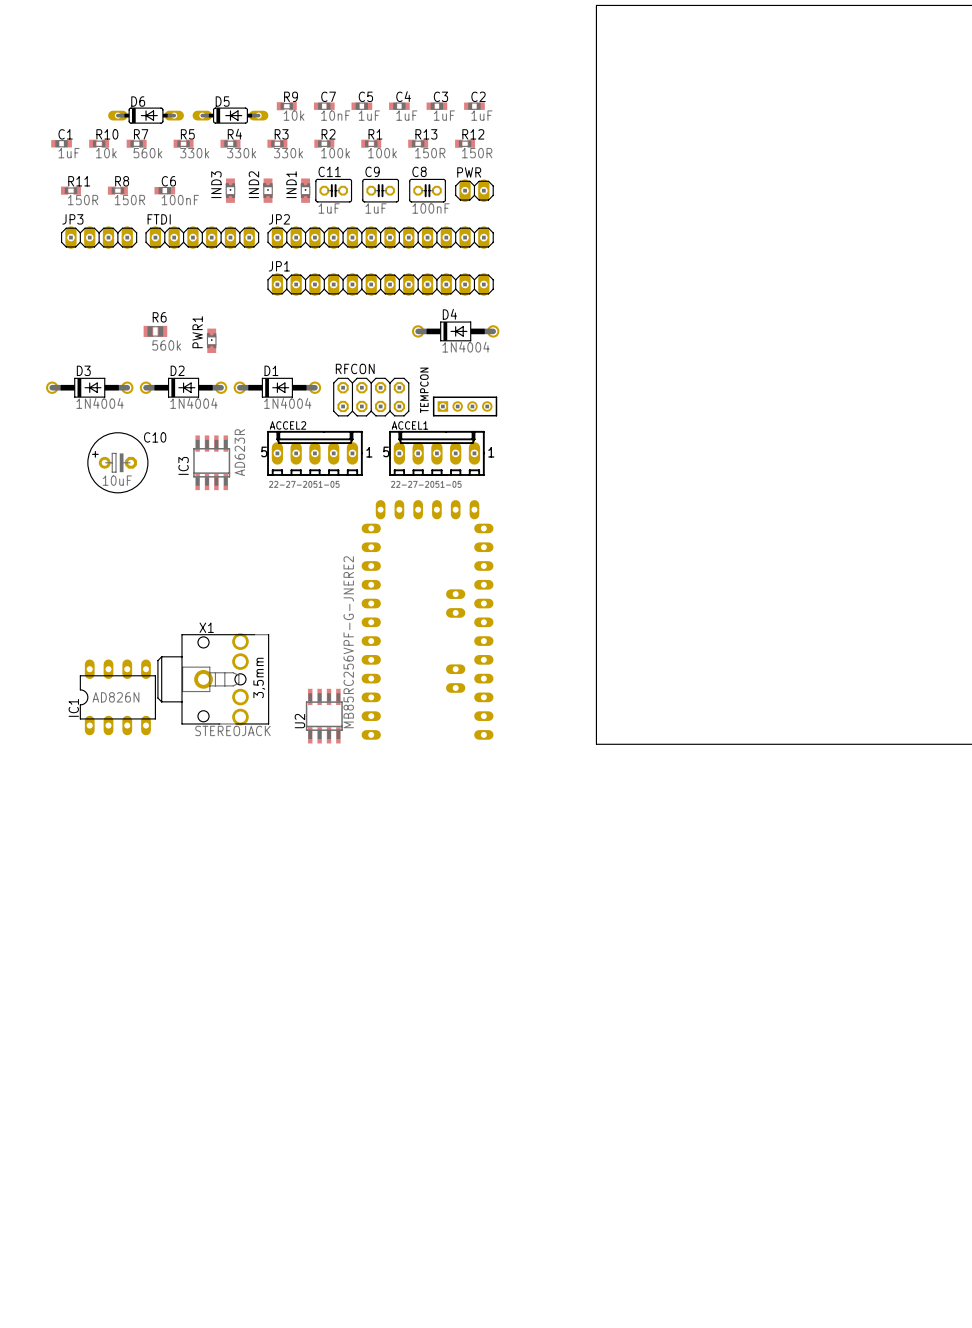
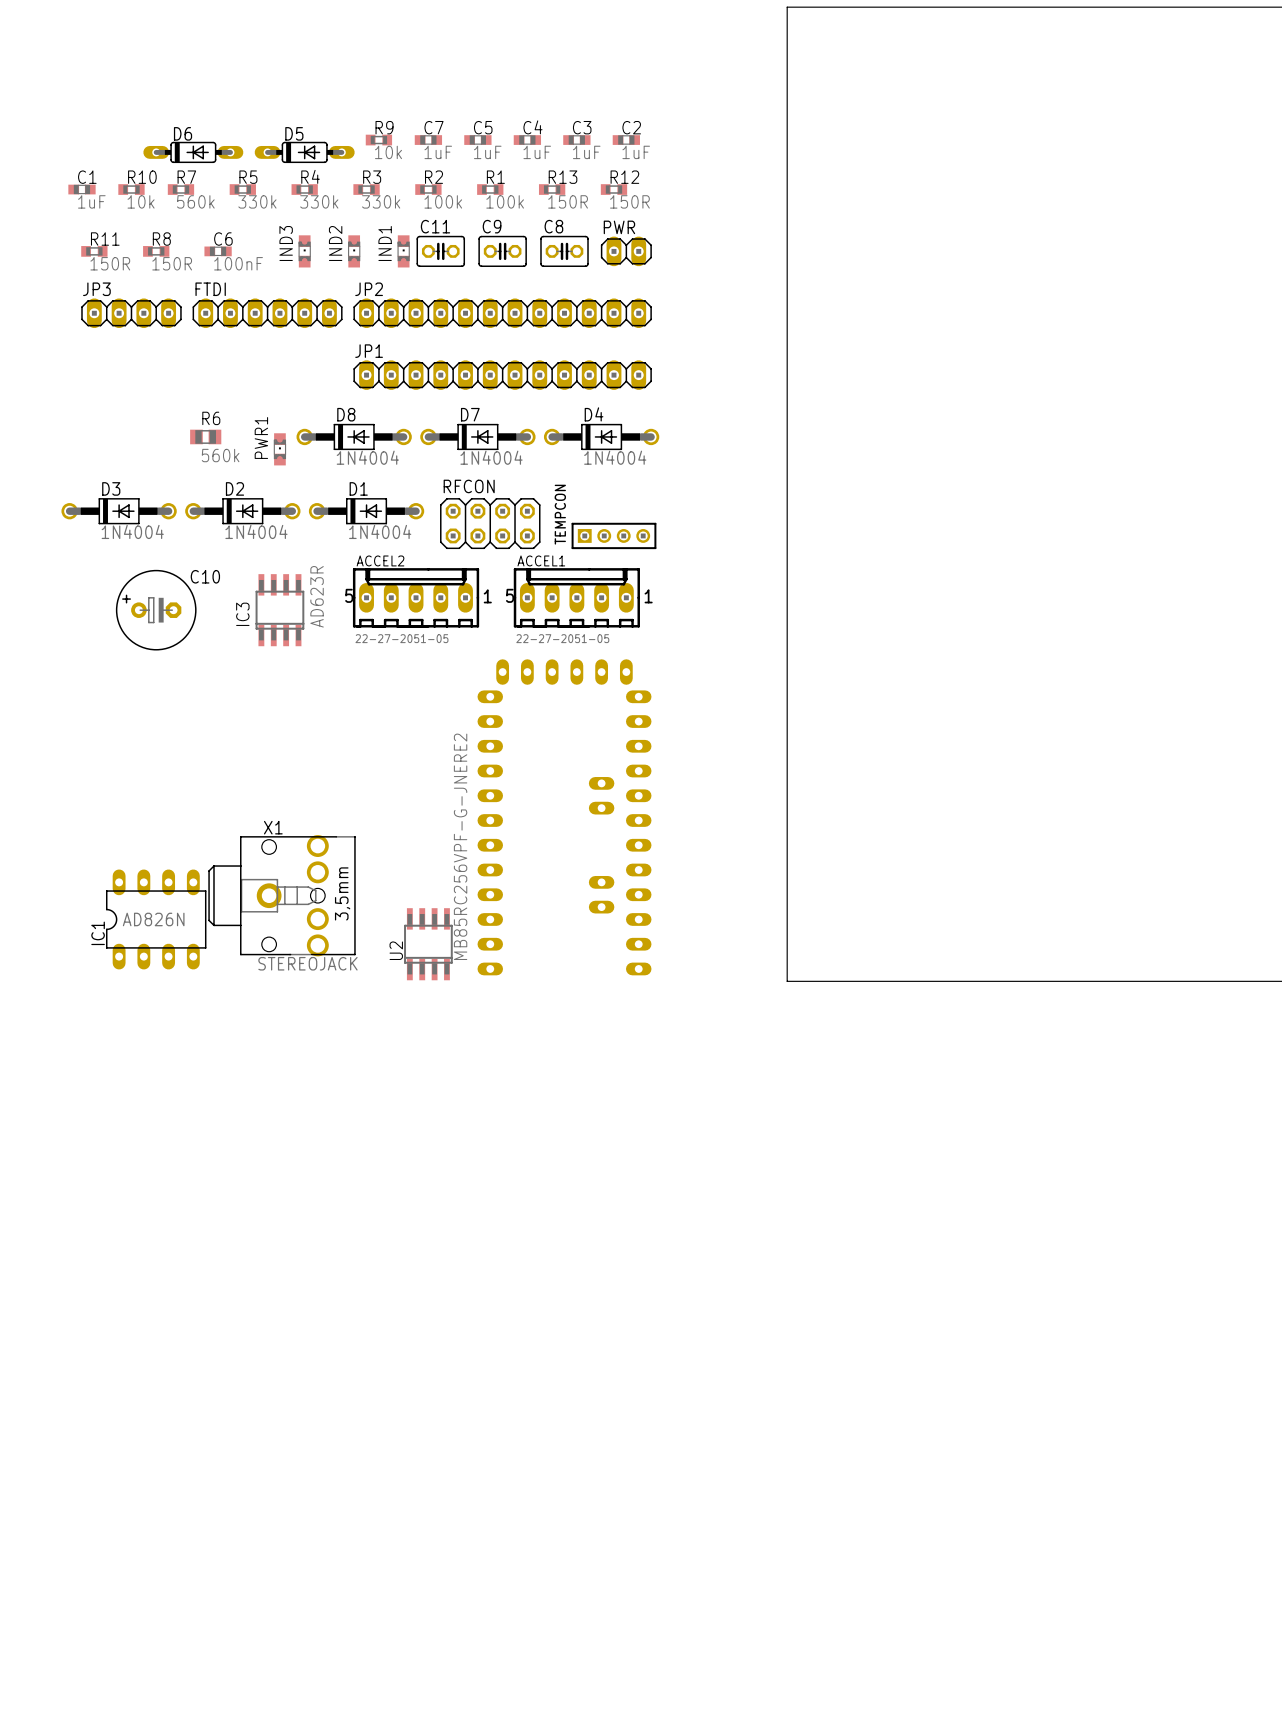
C7 value: 10nF (335, 115) -> 1uF (438, 152)
C11 value: 1uF (329, 208) -> none
C9 value: 1uF (376, 208) -> none
C8 value: 100nF (430, 208) -> none
D8: none -> 1N4004 (354, 436)
D7: none -> 1N4004 (477, 436)
C10 value: 10uF (117, 480) -> none

